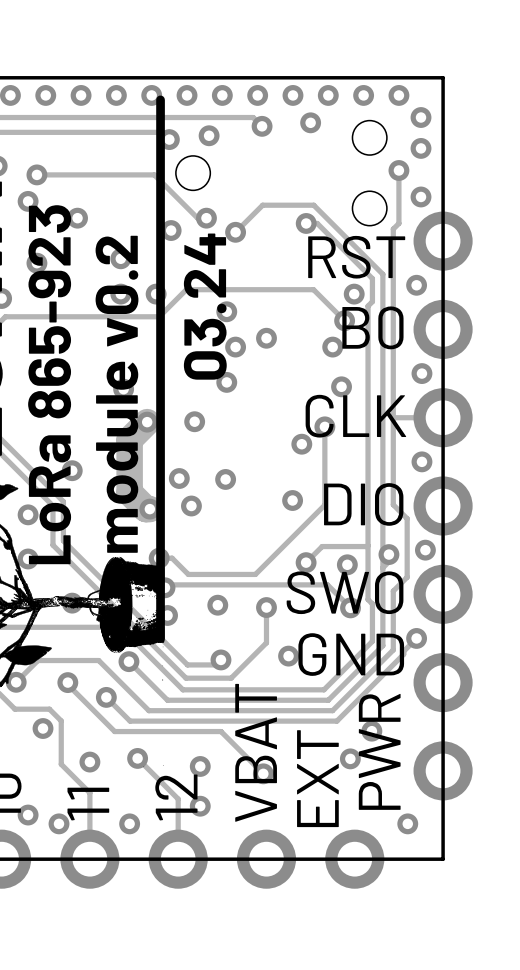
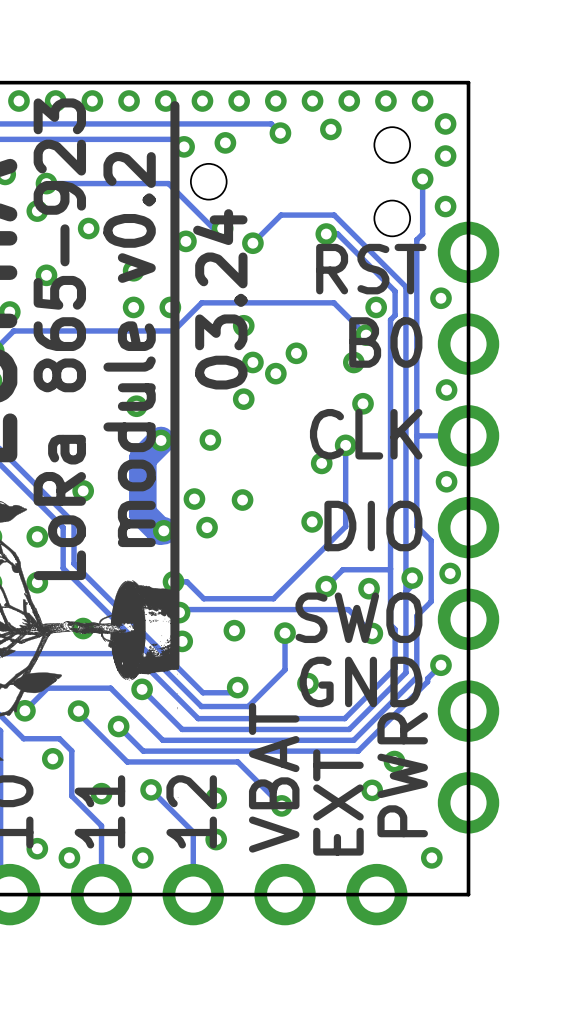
via: (266, 338) -> none
via: none -> (296, 353)
via: none -> (275, 373)

